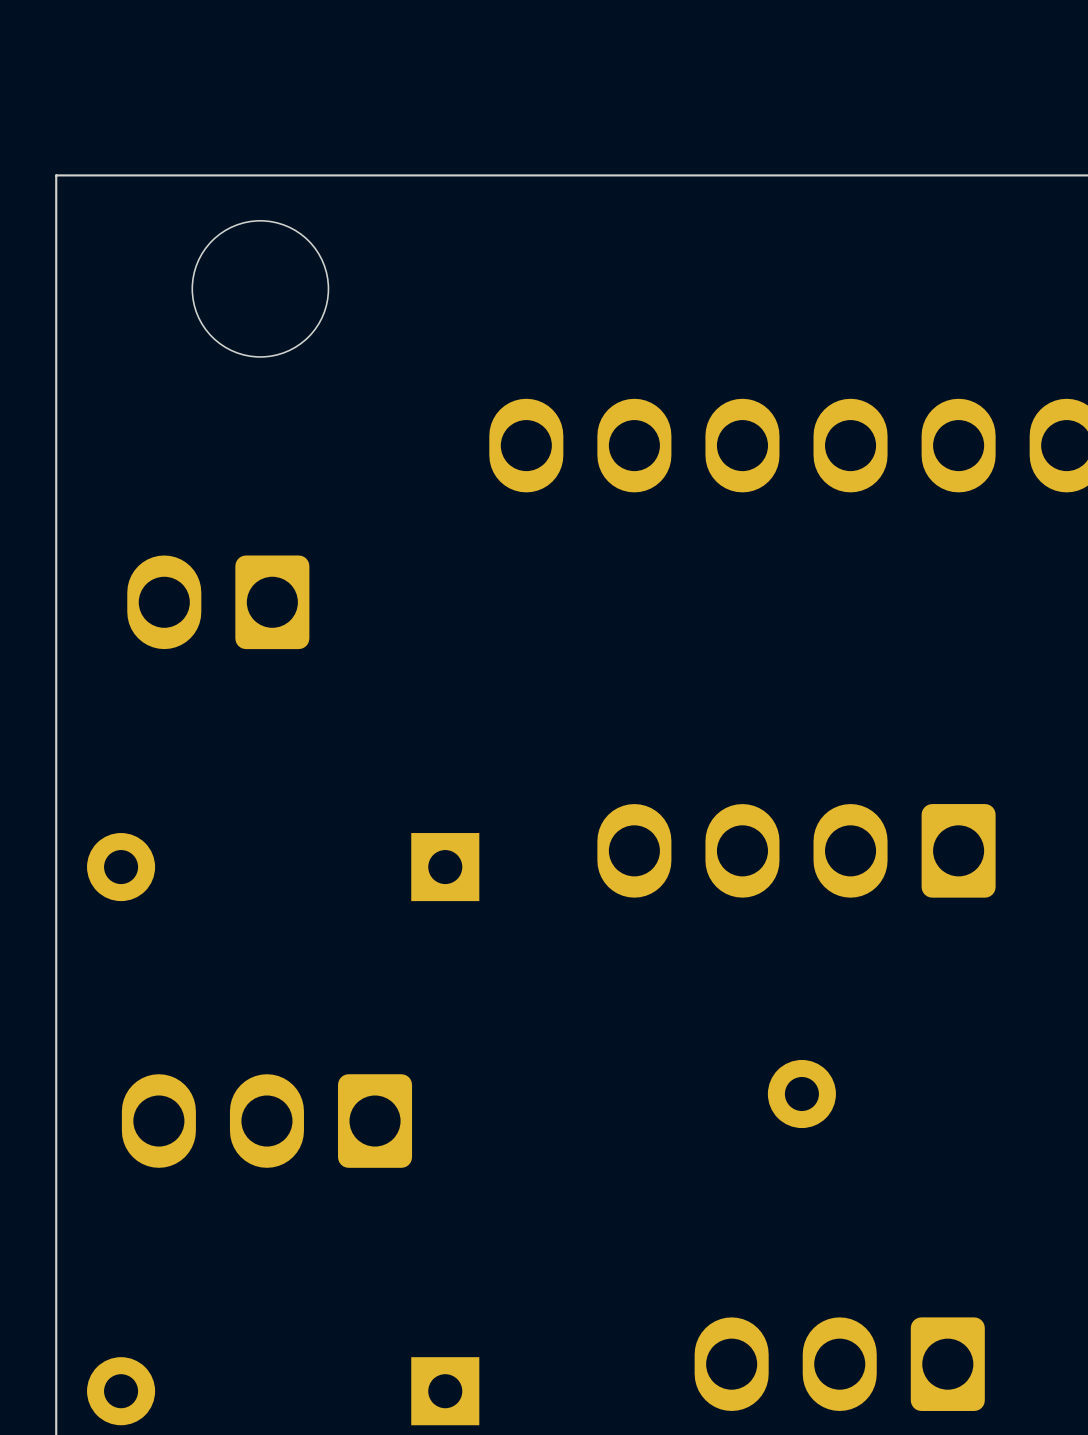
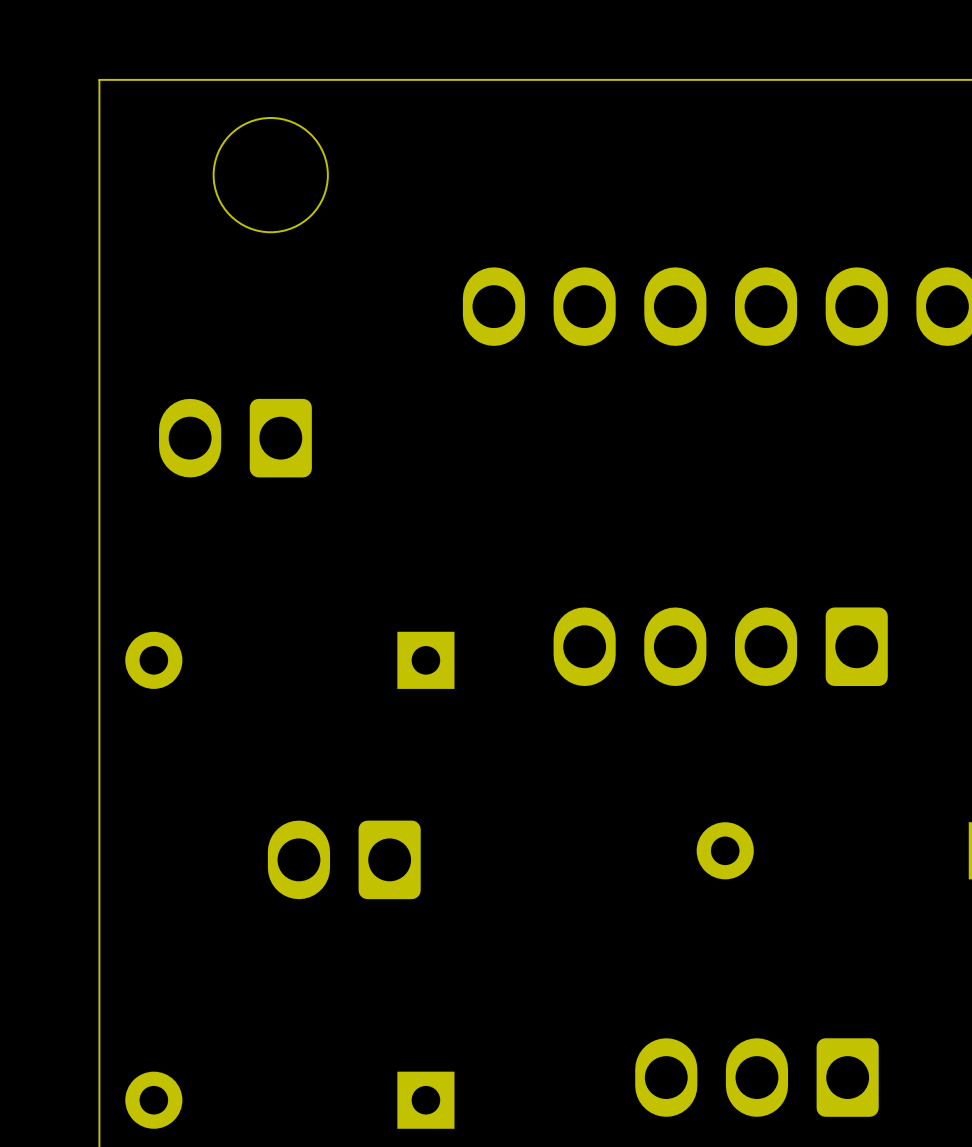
part: none -> (344, 859)
part: (266, 1121) -> none

